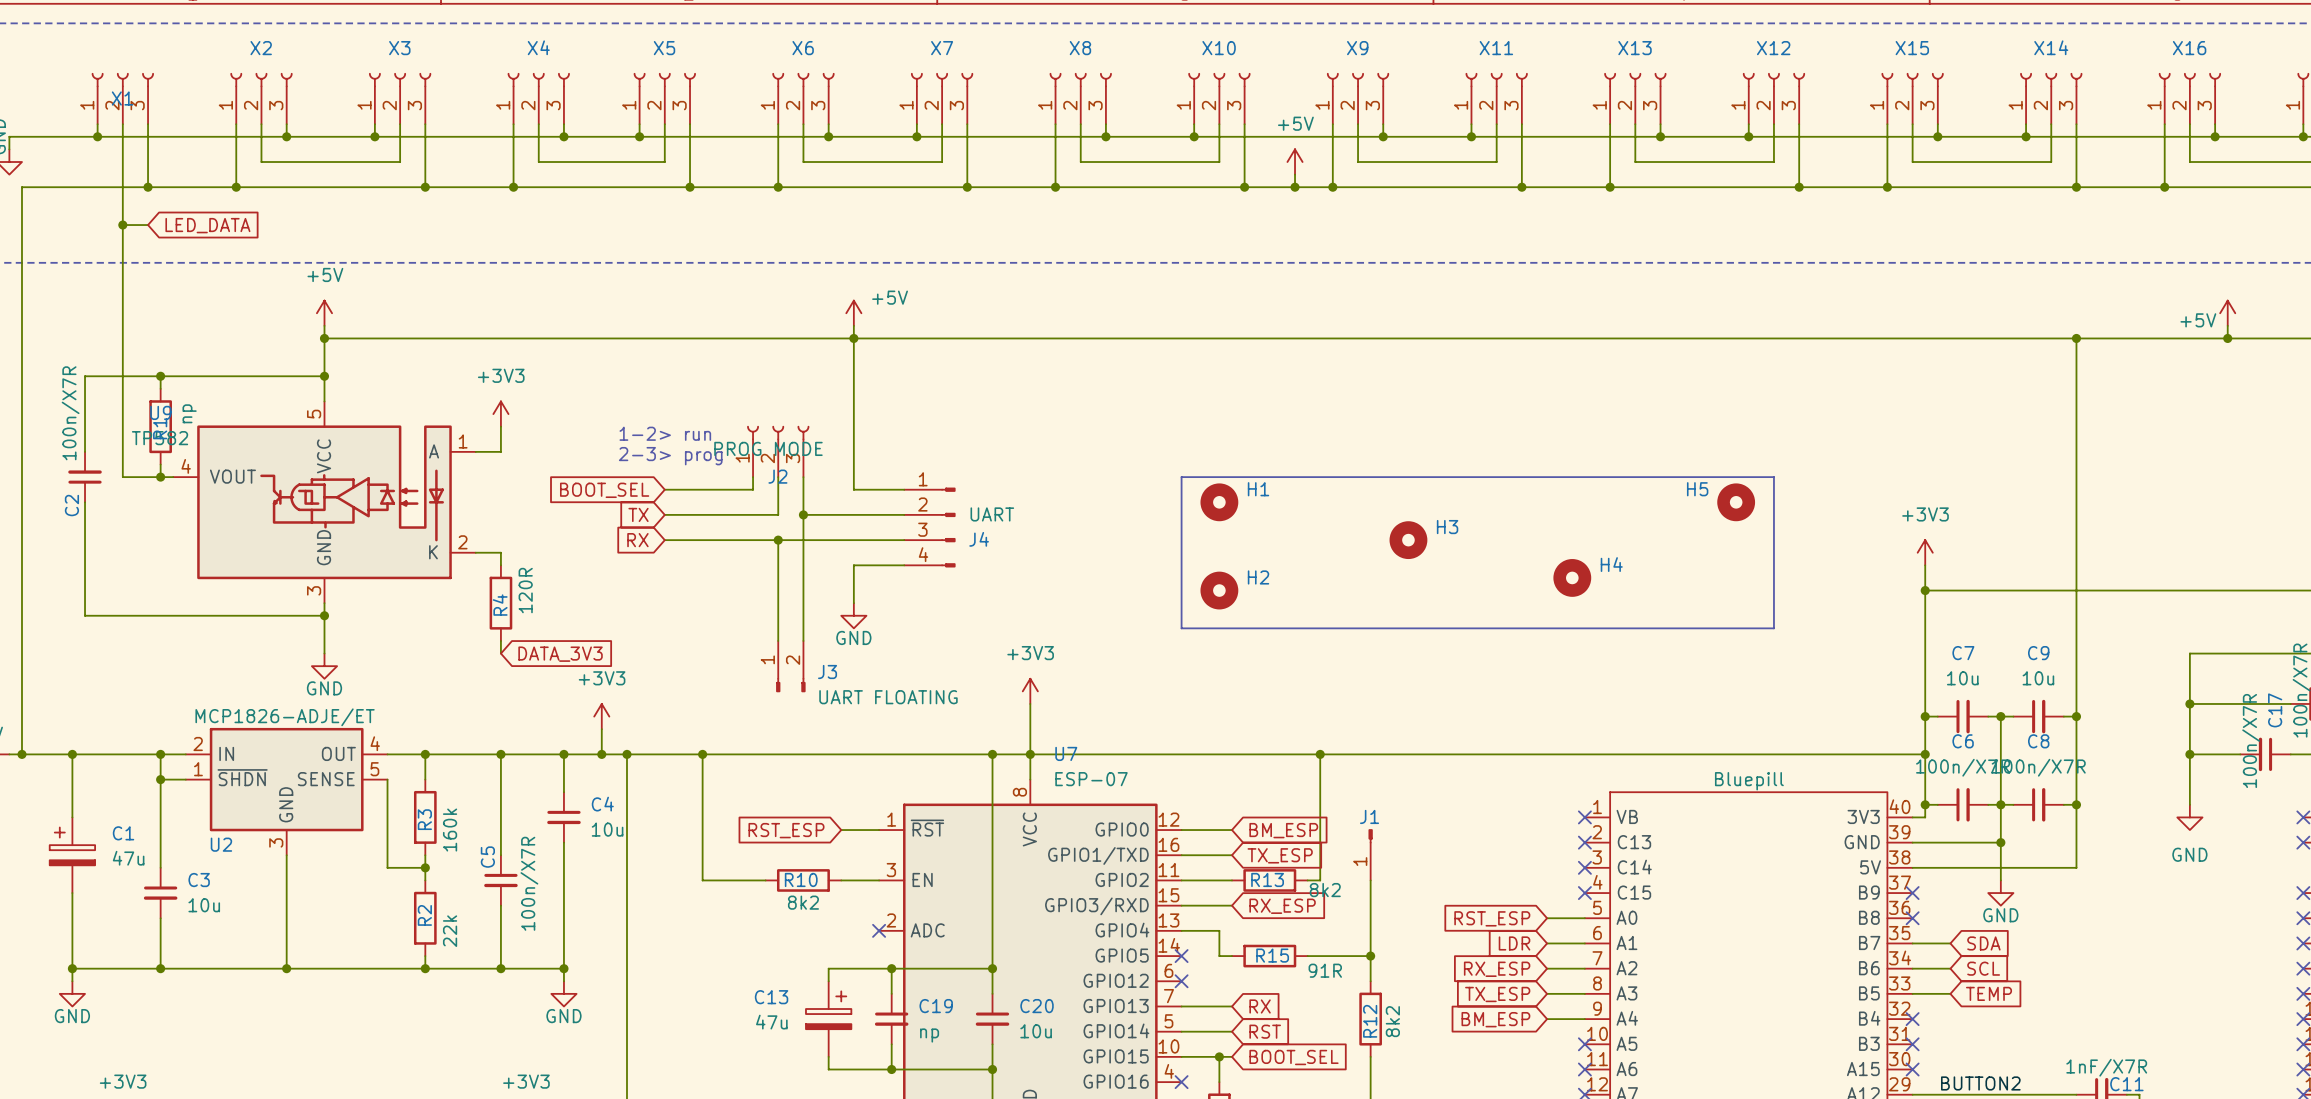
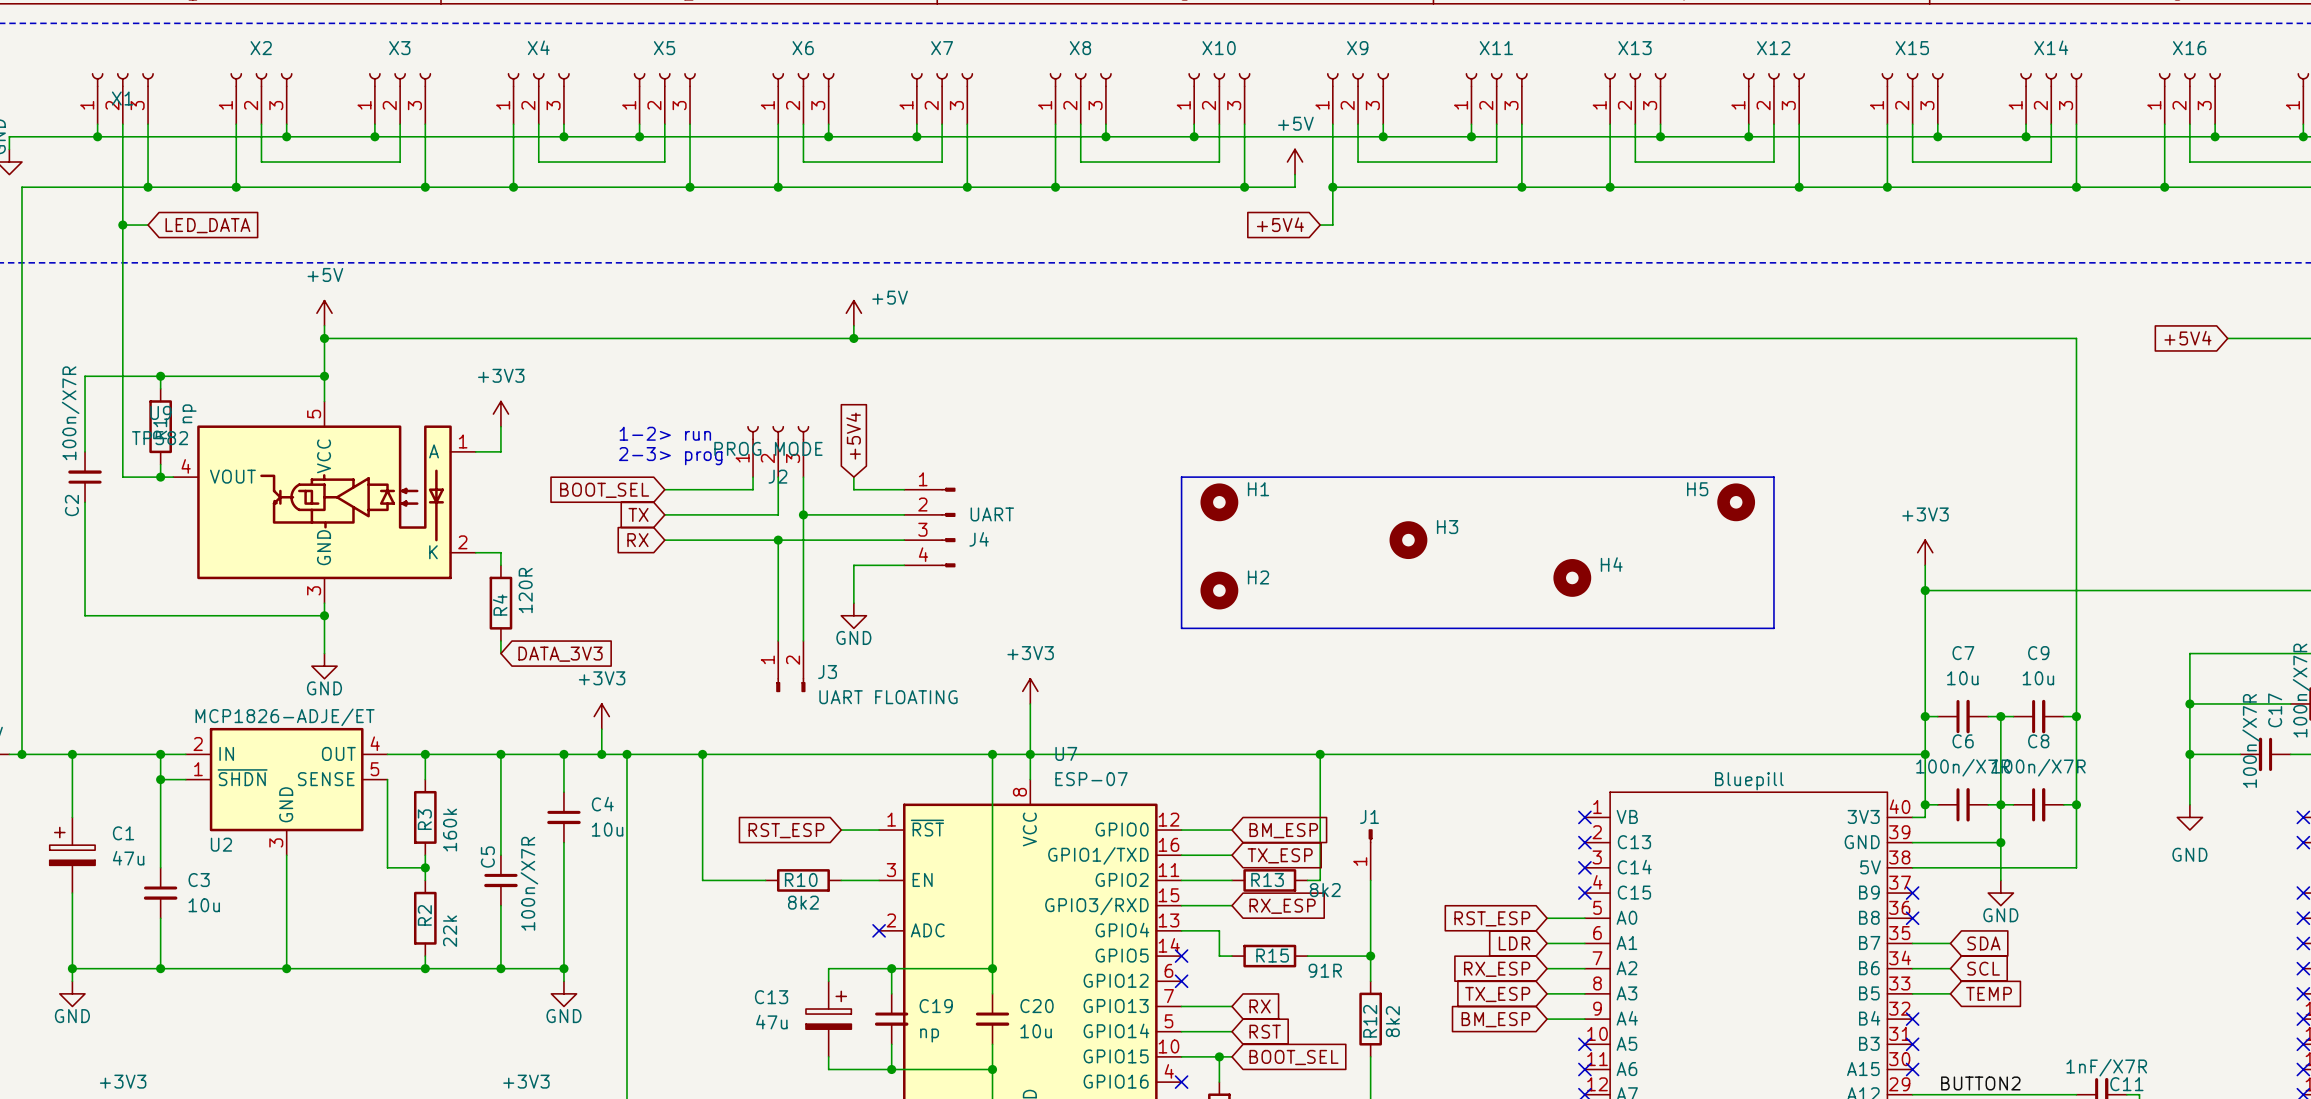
wire: (1295, 187) (1332, 187) -> (1320, 225) (1332, 225) (1332, 187)
junction: (1295, 187) -> none
global label: none -> +5V4 (1280, 224)
power symbol: +5V (2227, 313) -> none
wire: (2227, 325) (2227, 338) (2076, 338) -> none
wire: (853, 338) (853, 477) -> none
junction: (2076, 338) -> none
global label: none -> +5V4 (2187, 338)
junction: (2227, 338) -> none
global label: none -> +5V4 (853, 436)

